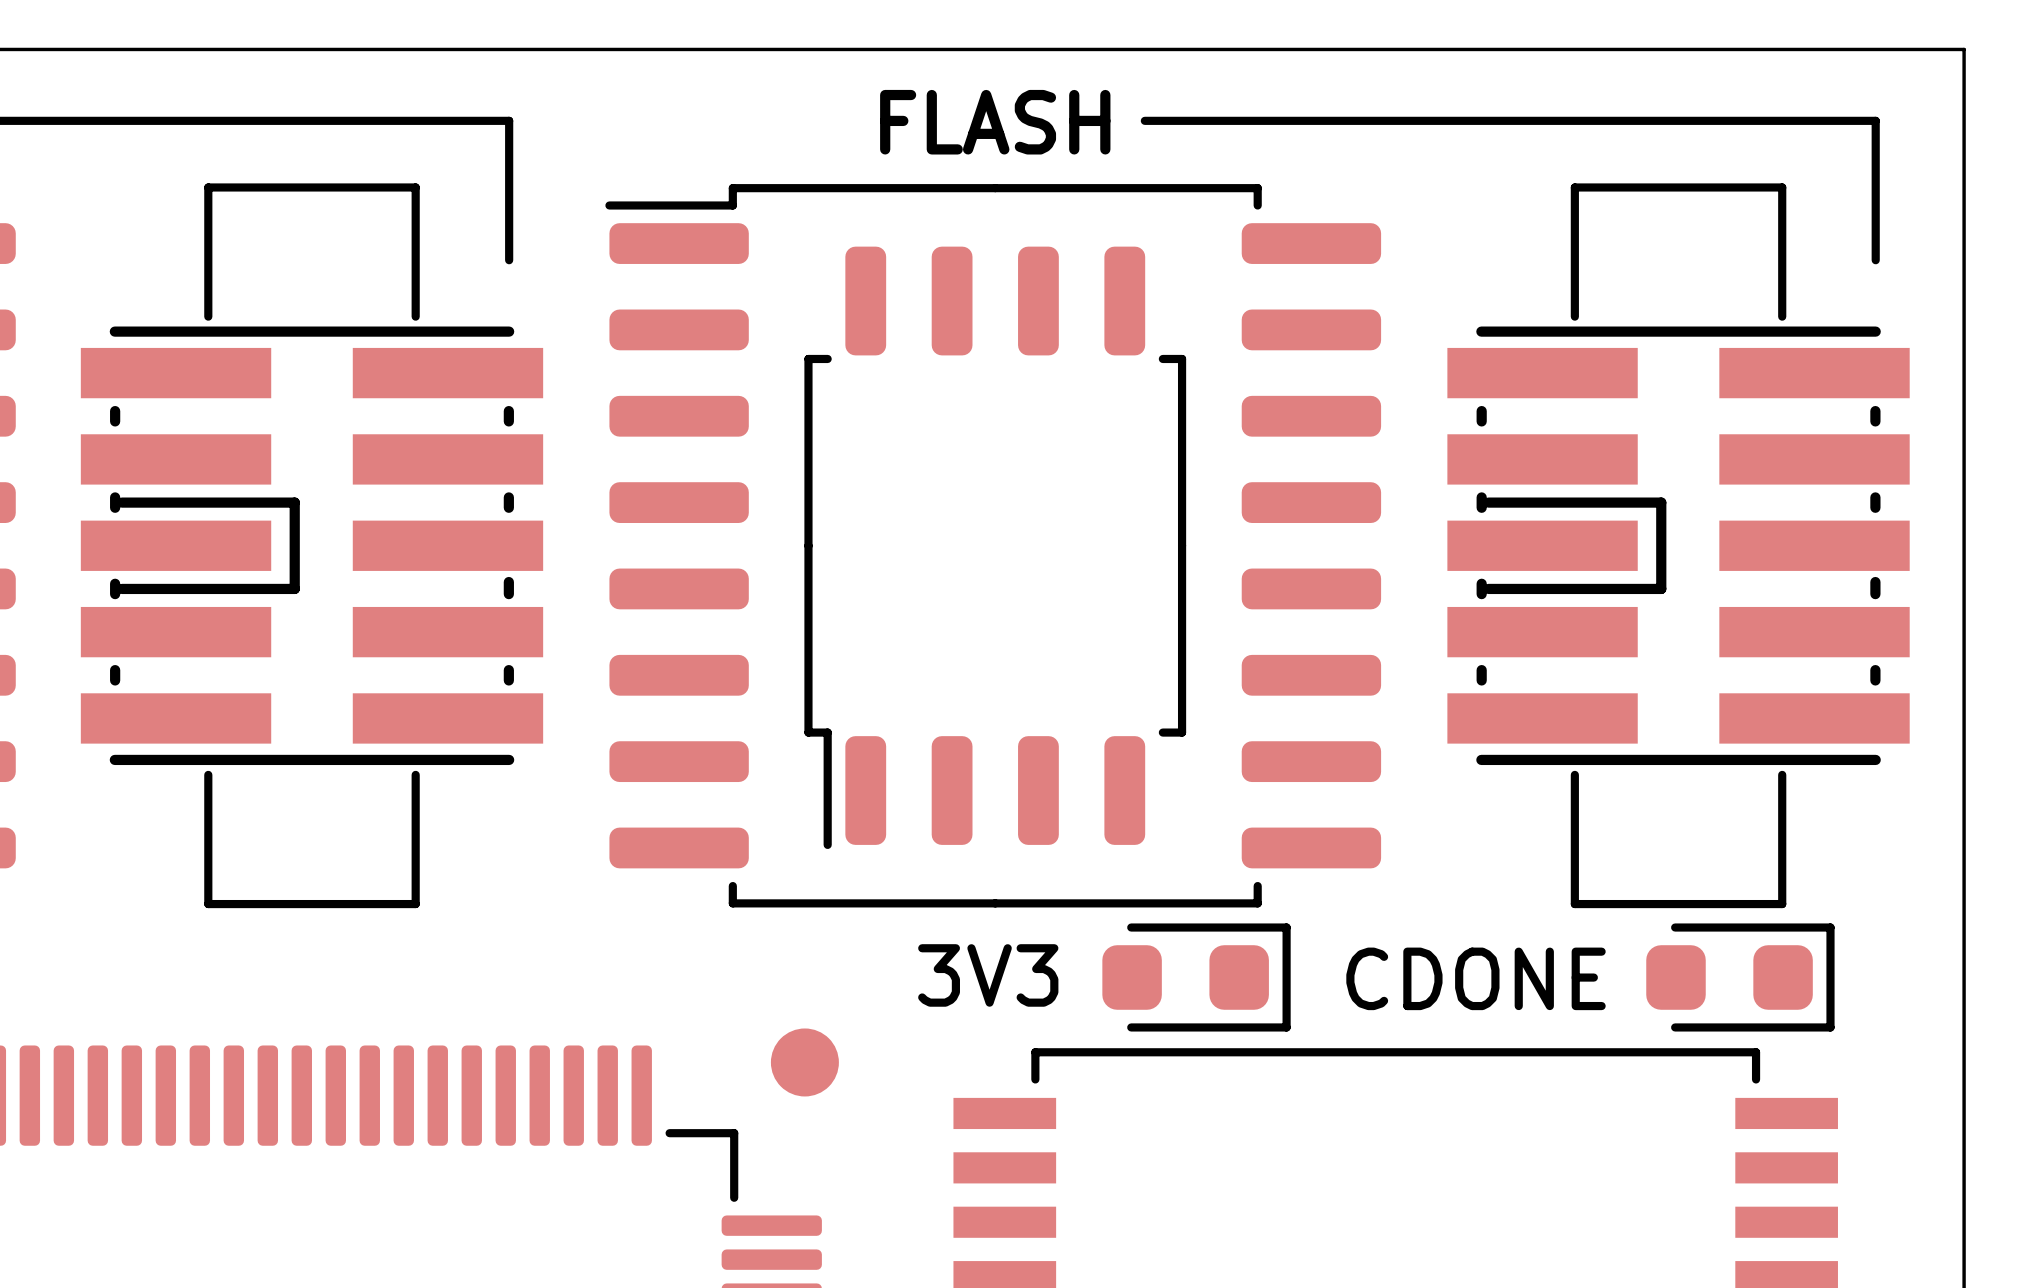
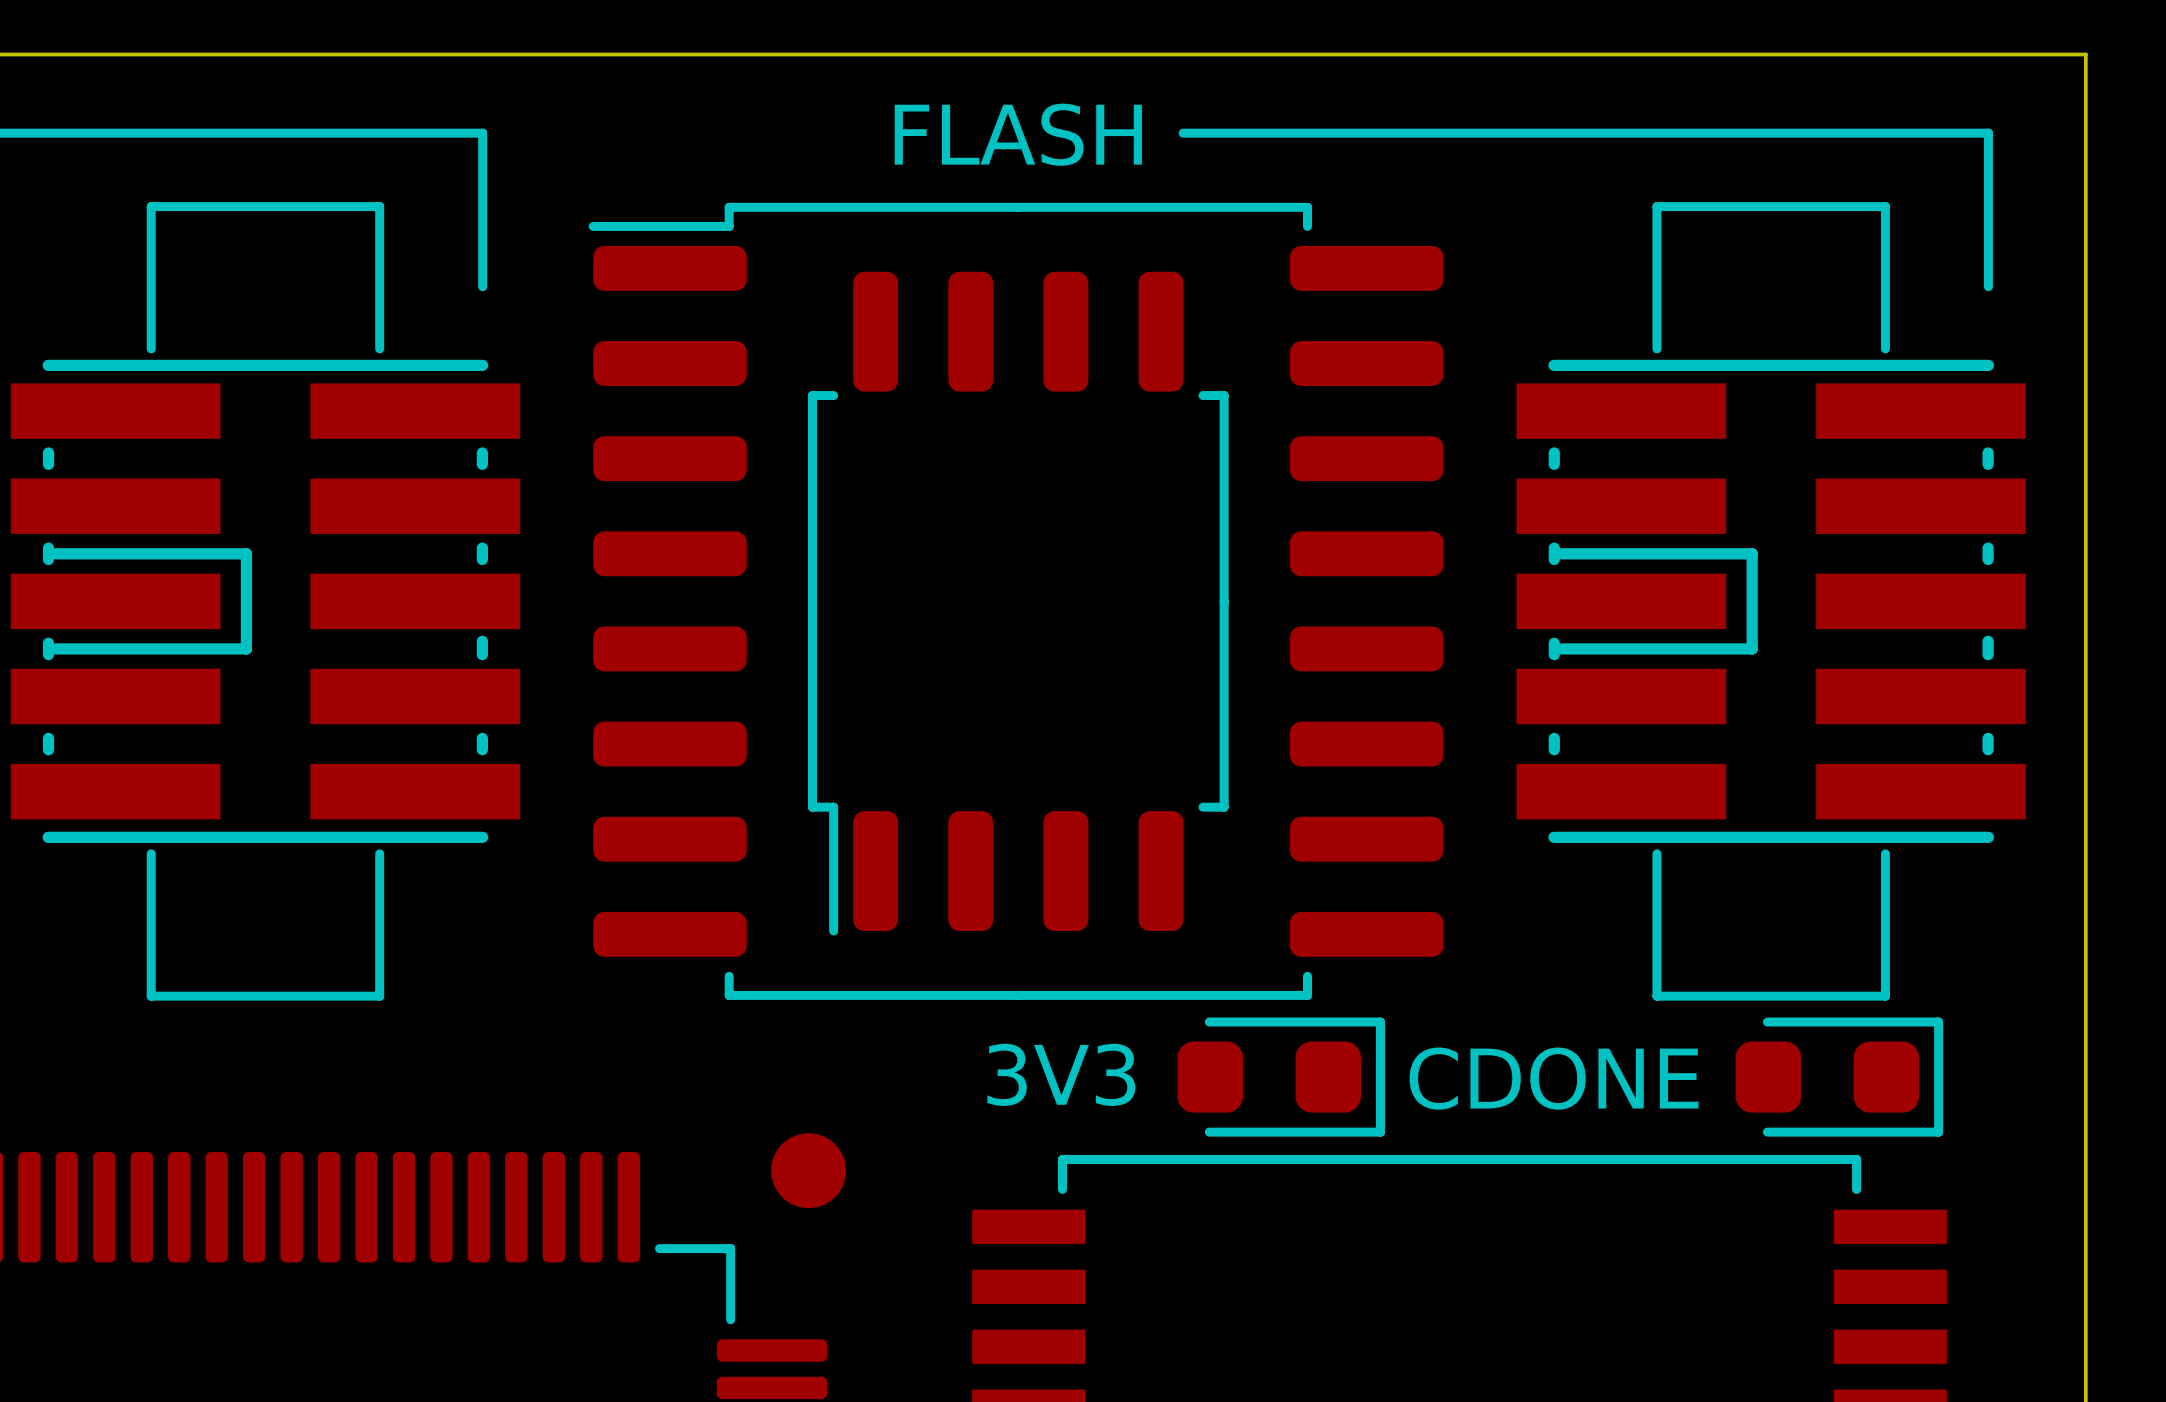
text position: 3V3 (988, 975) -> 3V3 (1061, 1074)
part position: (1196, 977) -> (1281, 1077)

